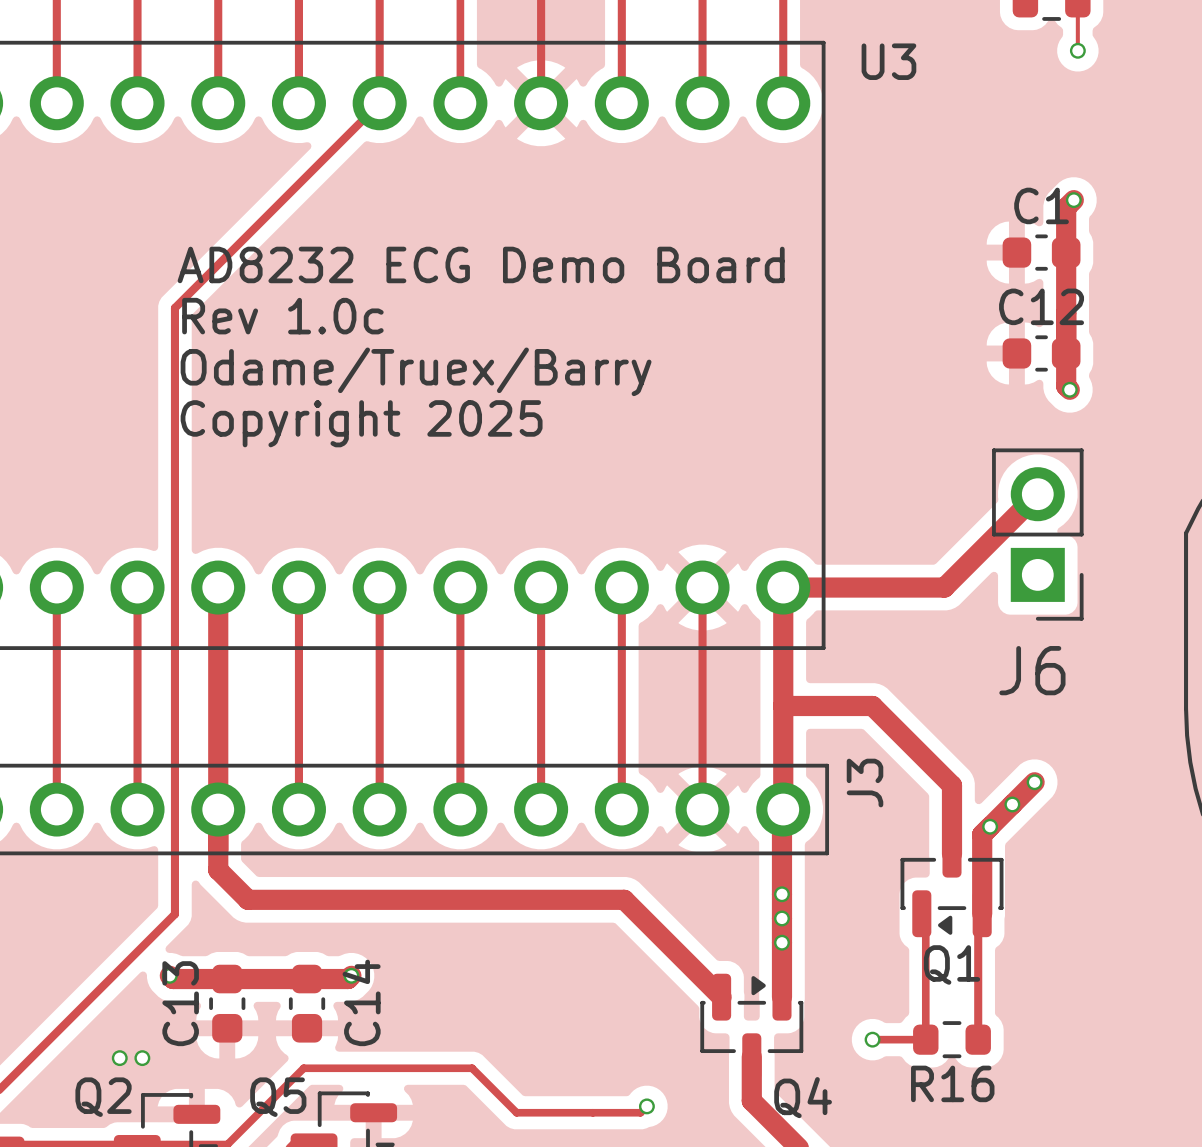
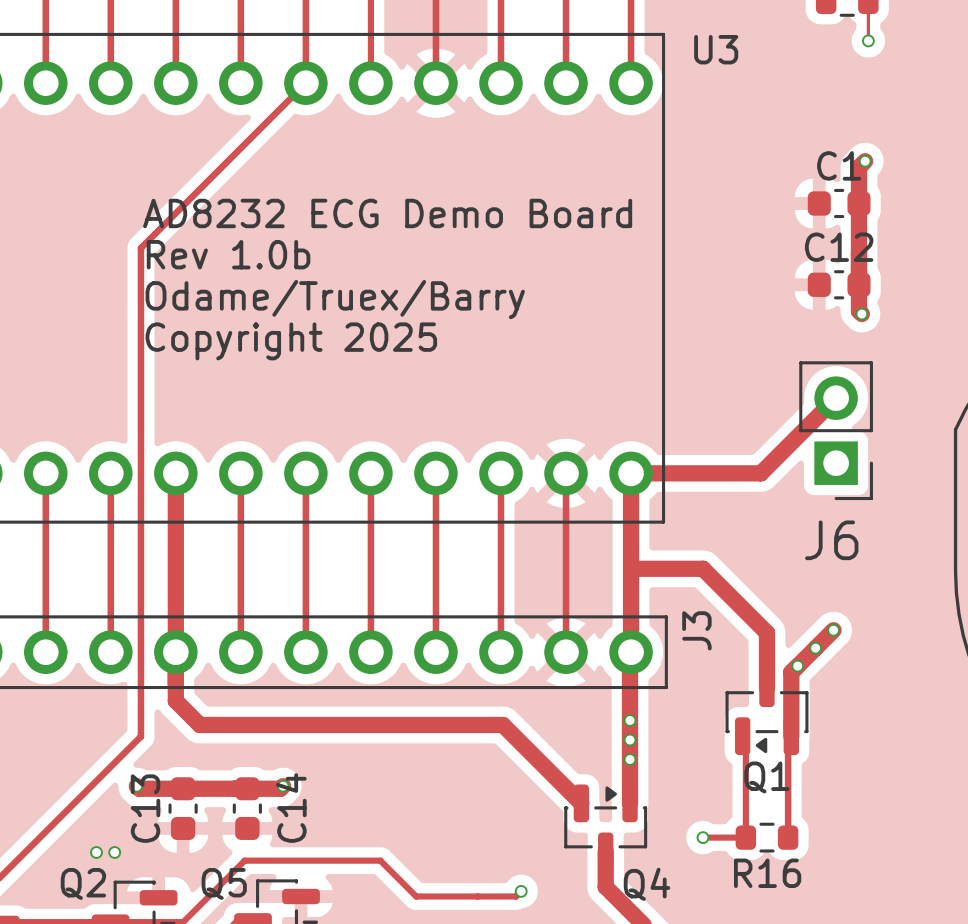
text: Rev 1.0c (282, 316) -> Rev 1.0b (228, 254)

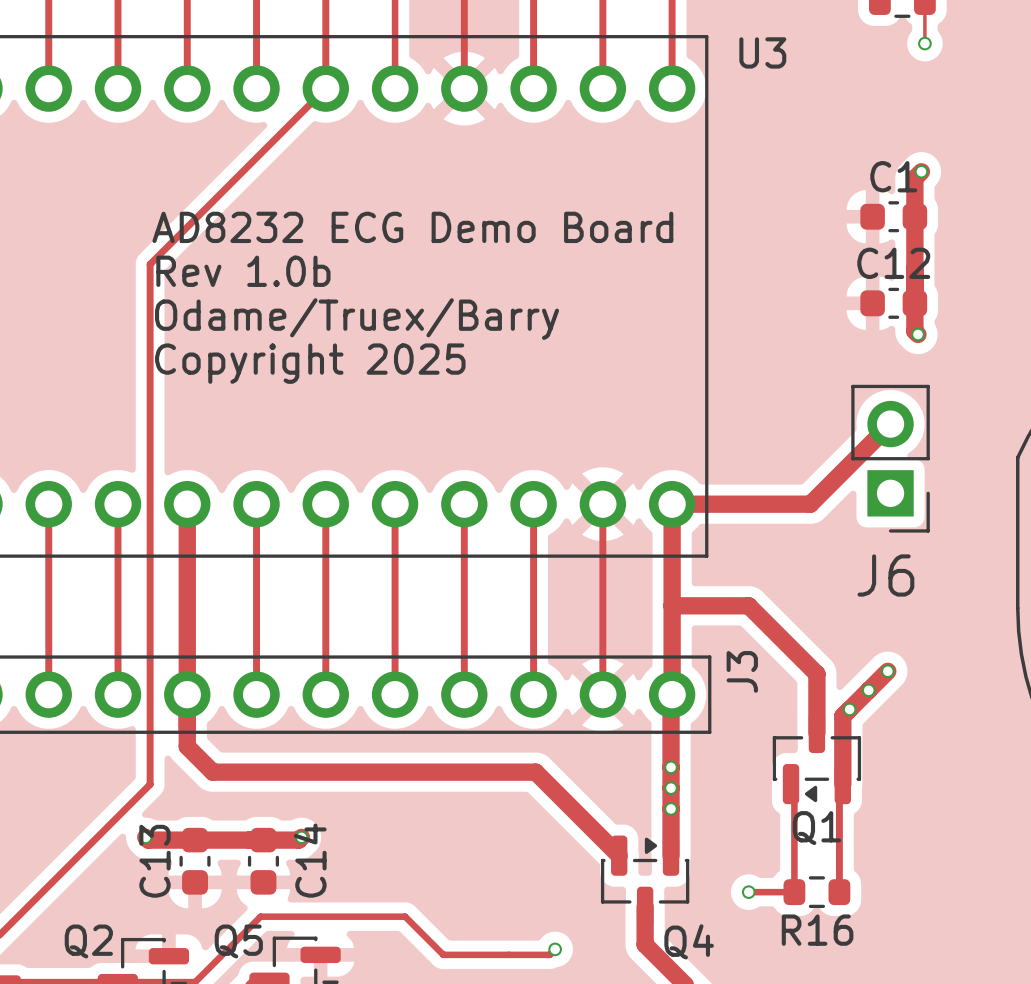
via: (96, 852) -> none
via: (114, 852) -> none

